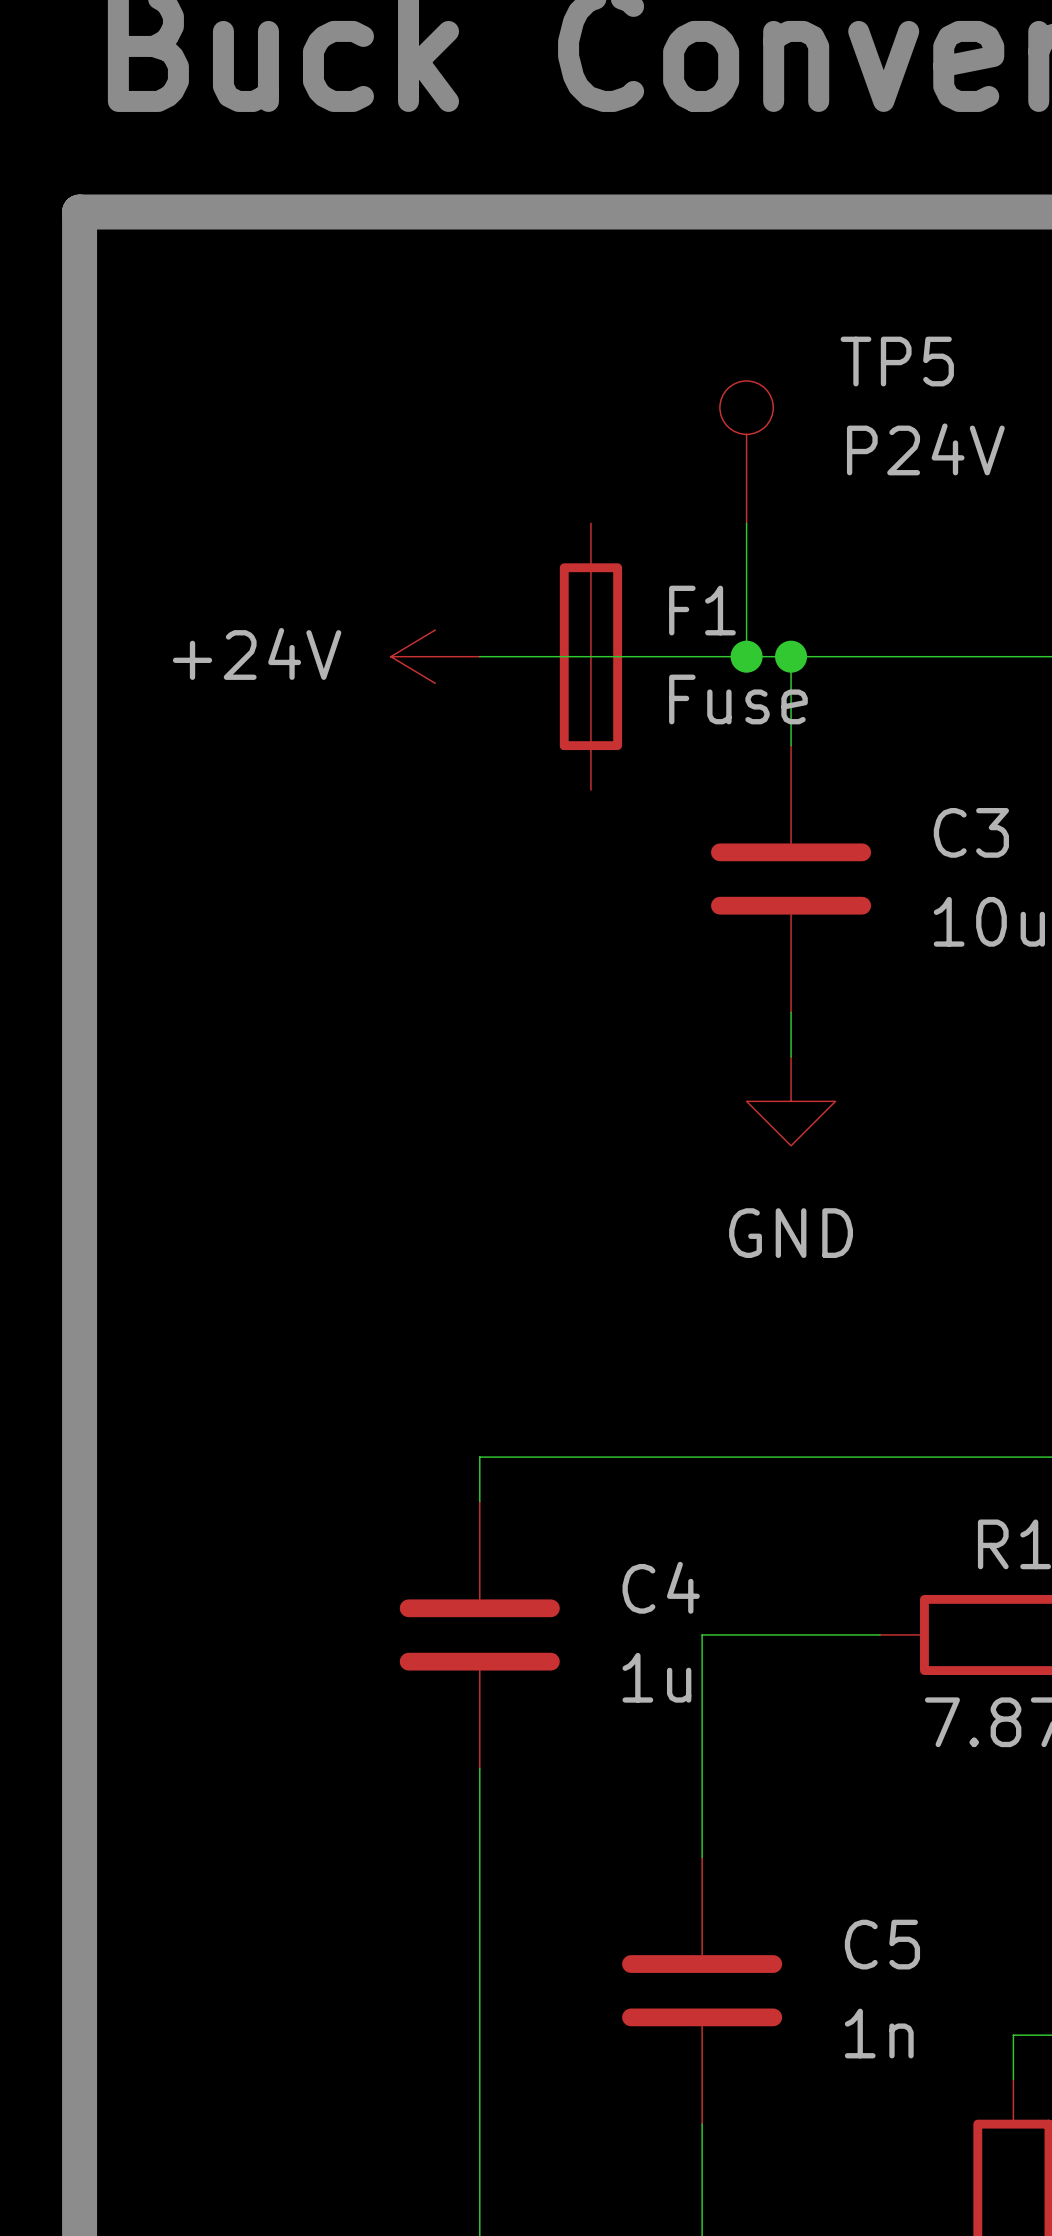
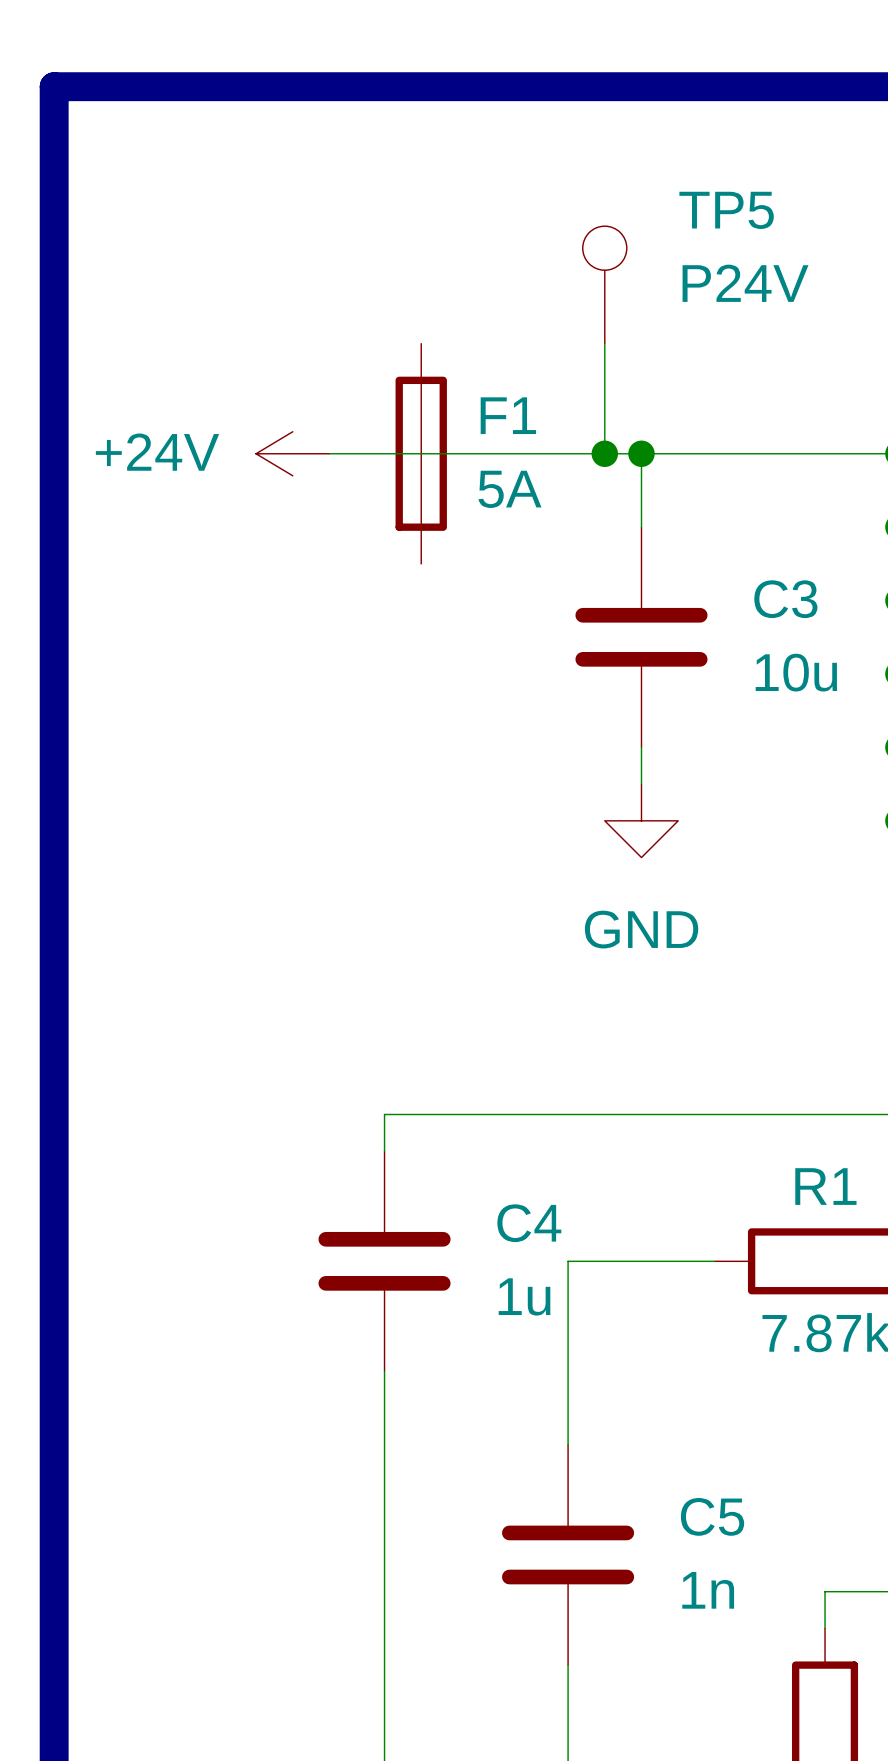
power symbol position: +24V (435, 656) -> +24V (292, 453)
F1 position: (590, 656) -> (421, 453)
F1 value: Fuse (738, 699) -> 5A (509, 489)

